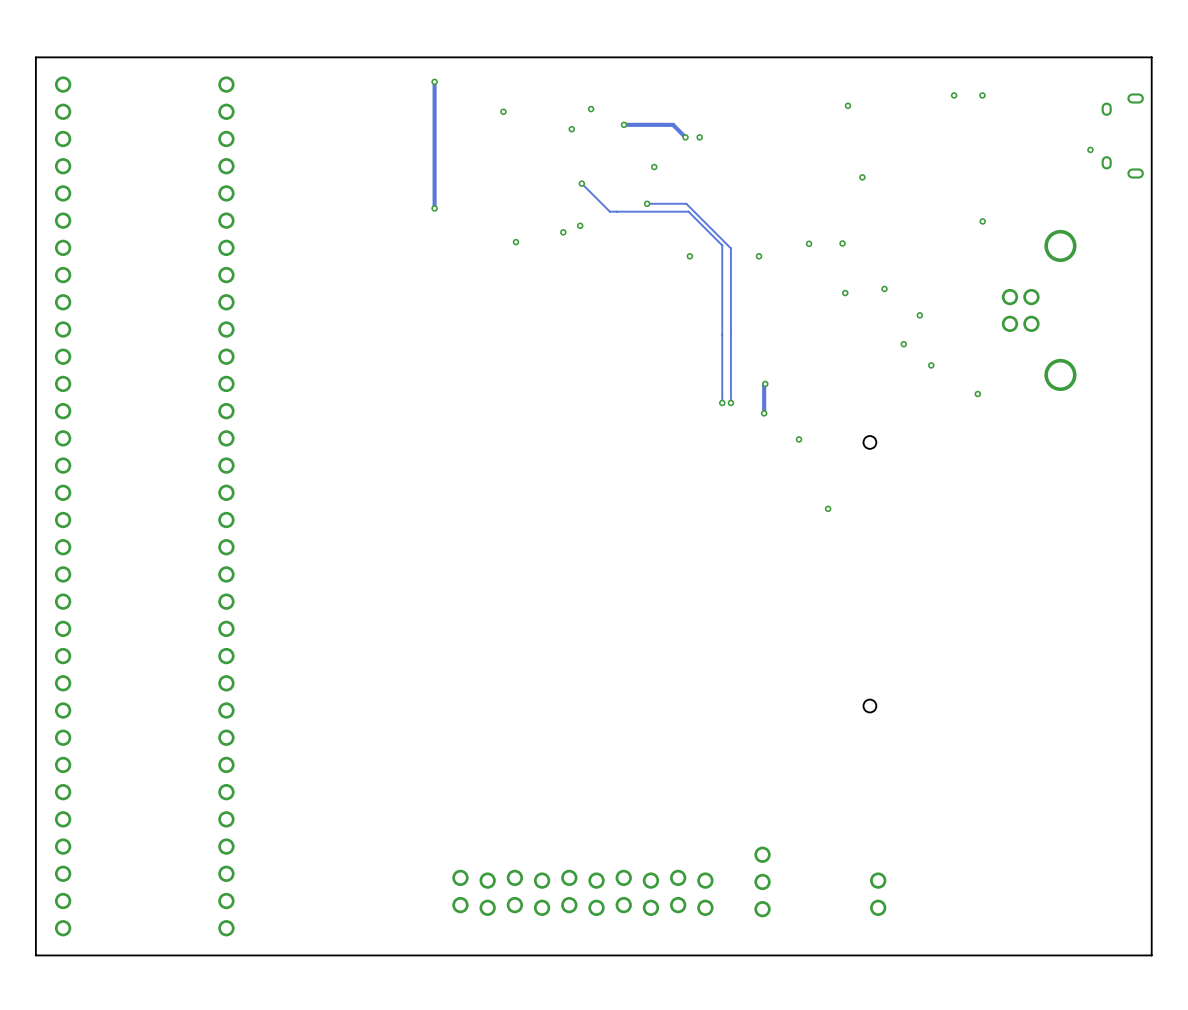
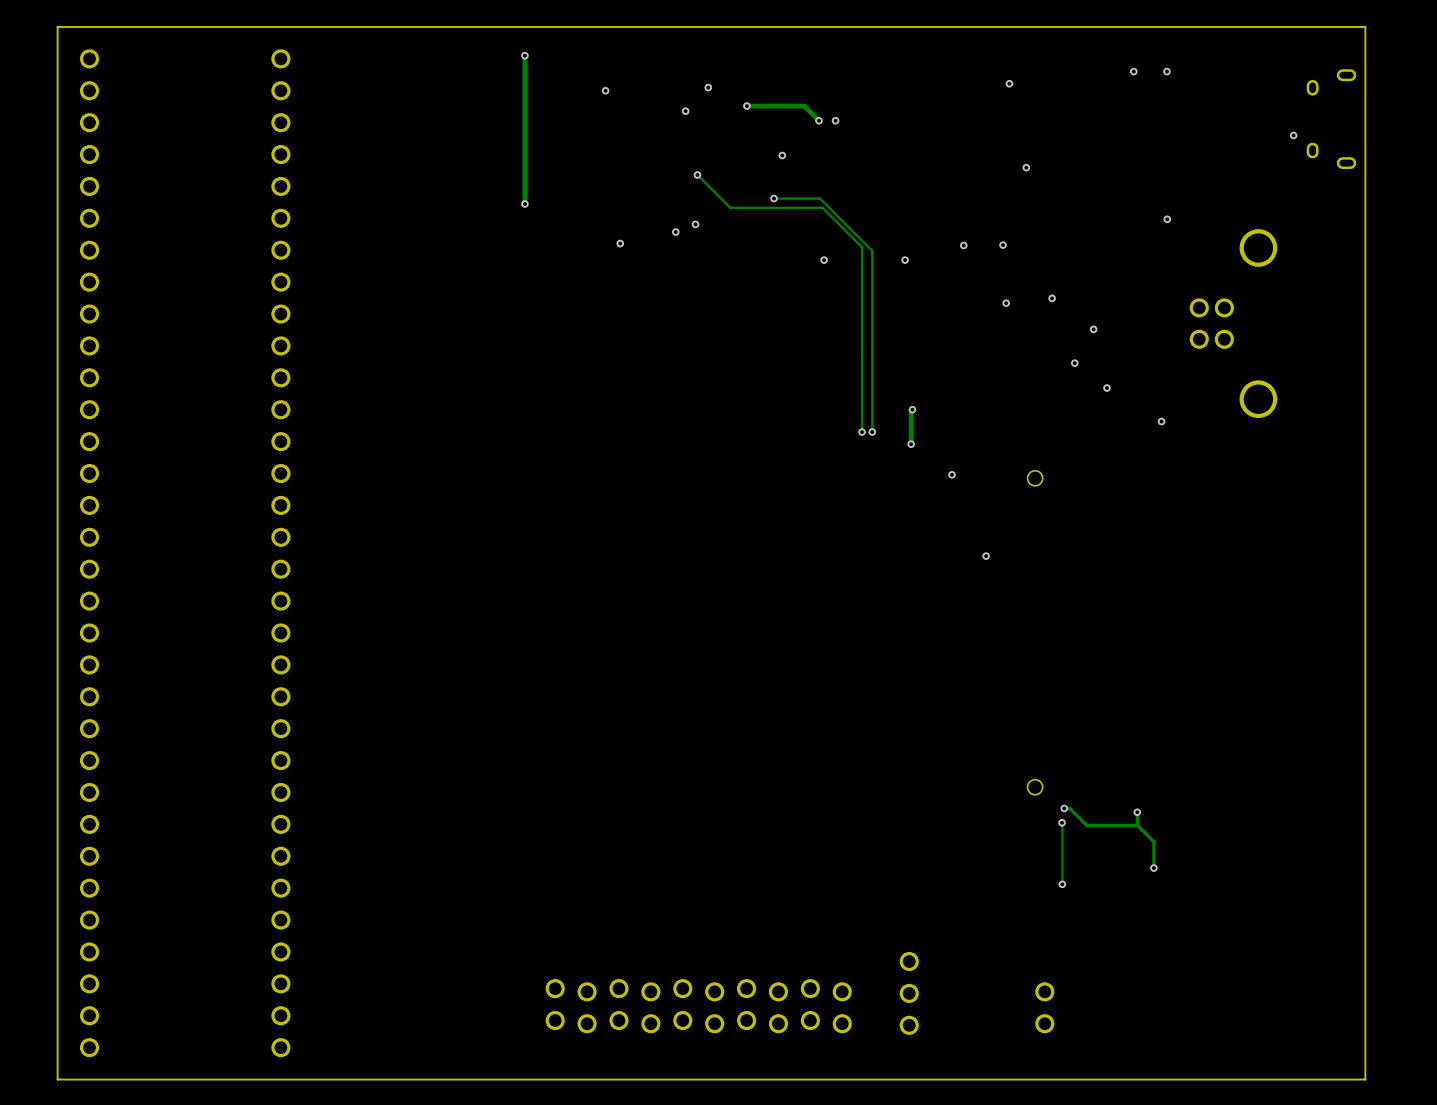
track: none -> (1064, 808) (1069, 808) (1086, 825) (1137, 825)
via: none -> (1064, 808)
track: none -> (1137, 812) (1137, 825)
via: none -> (1137, 812)
track: none -> (1062, 822) (1062, 884)
via: none -> (1062, 822)
track: none -> (1137, 825) (1153, 841) (1153, 868)
via: none -> (1153, 868)
via: none -> (1062, 884)

